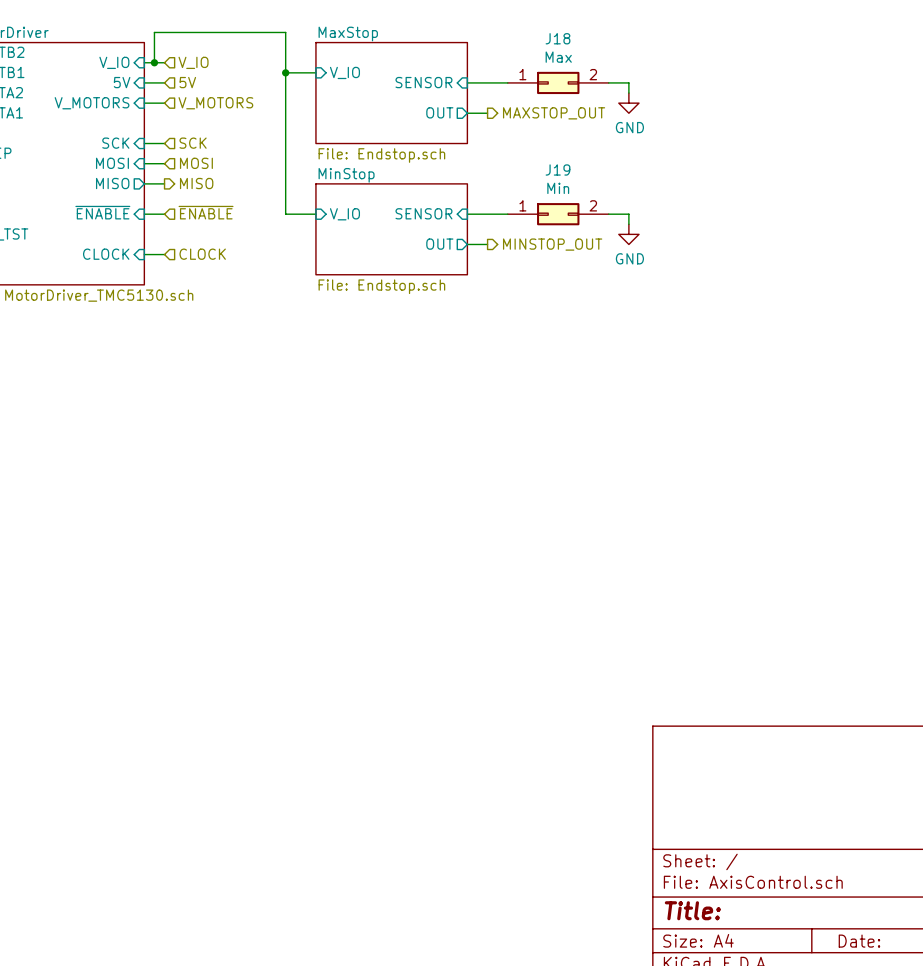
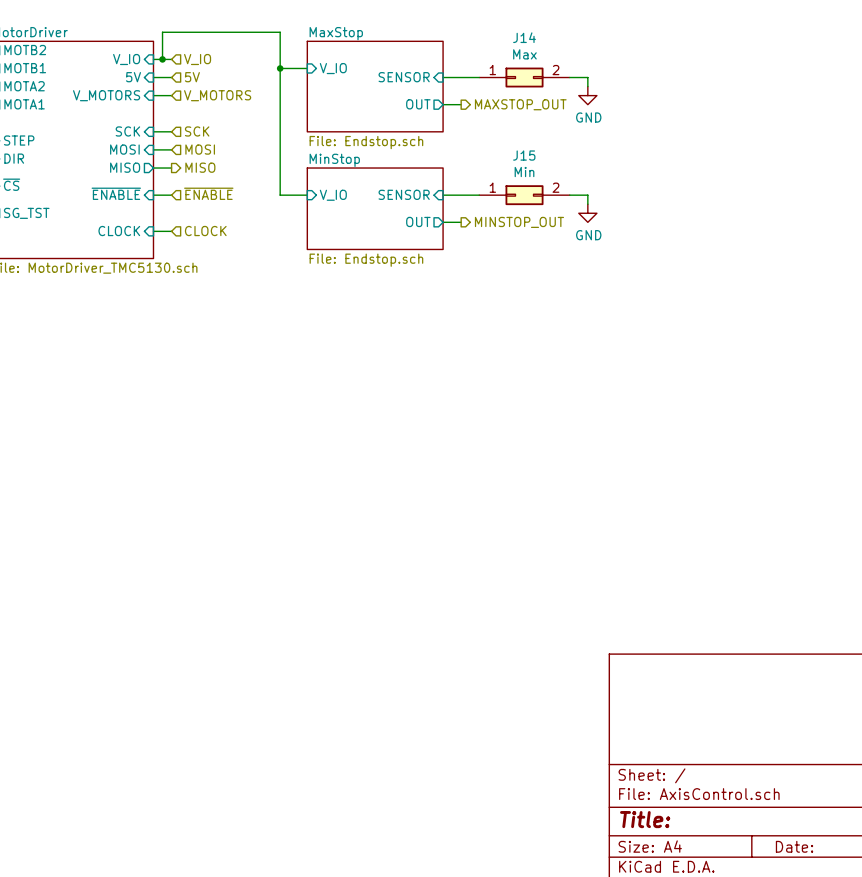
J18 name: J18 (558, 38) -> J14 (524, 37)
J19 name: J19 (558, 169) -> J15 (524, 155)

